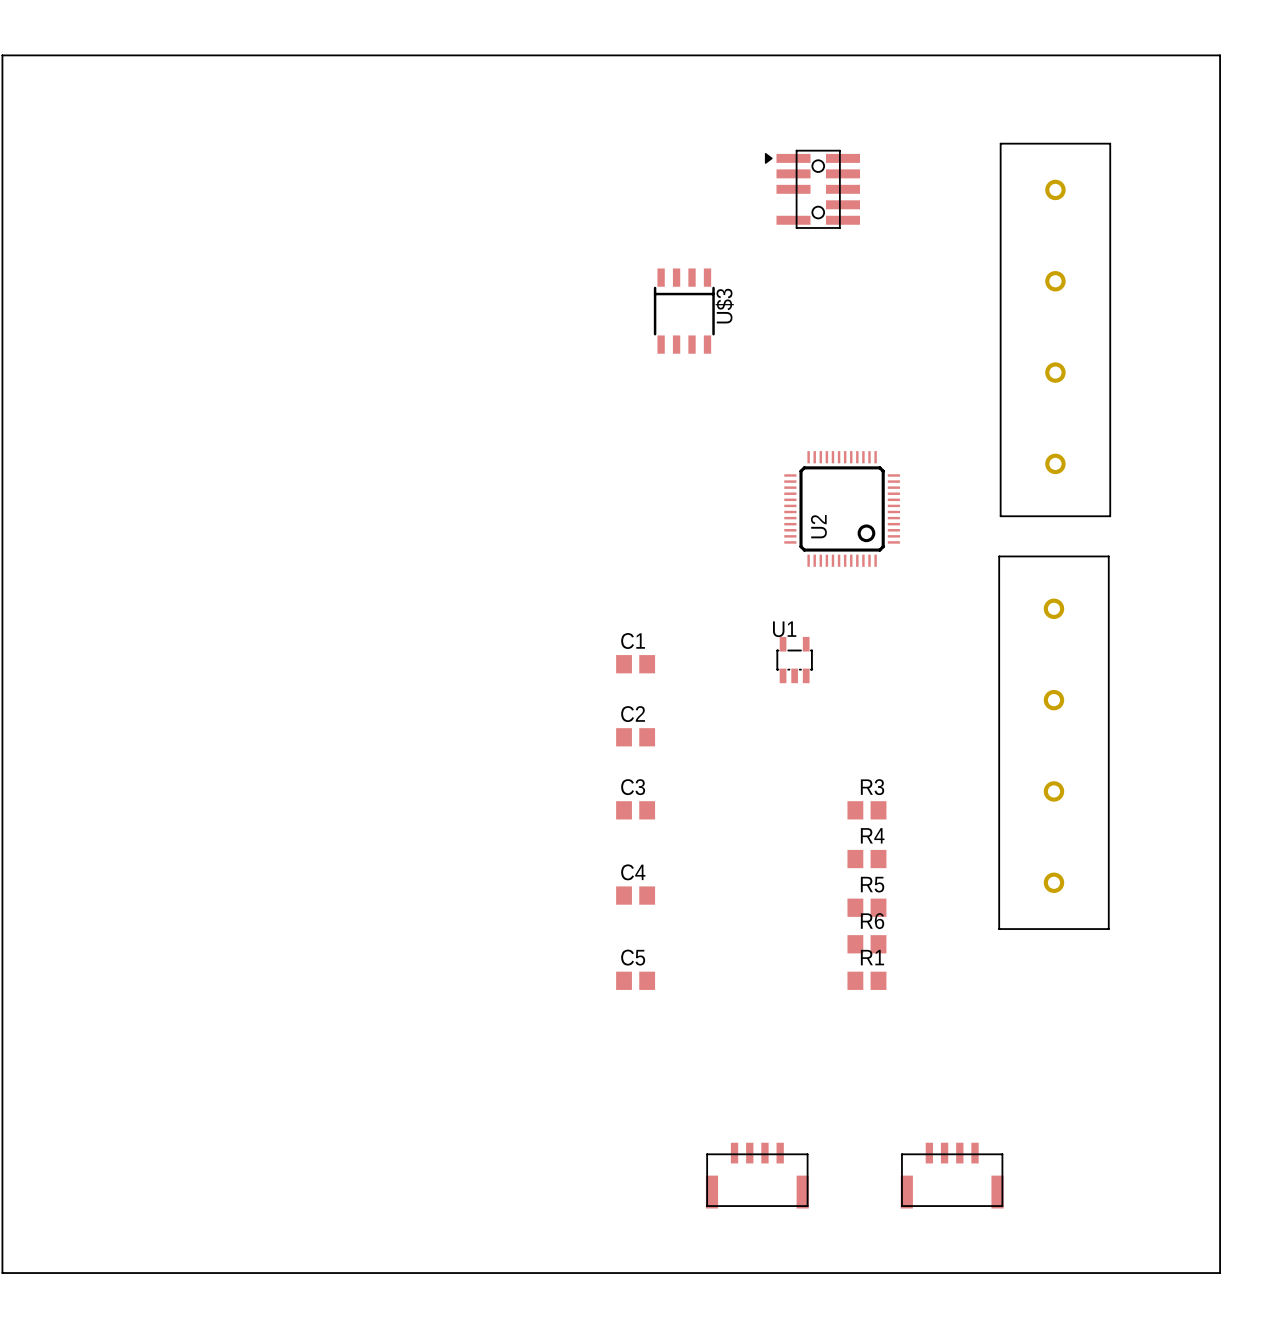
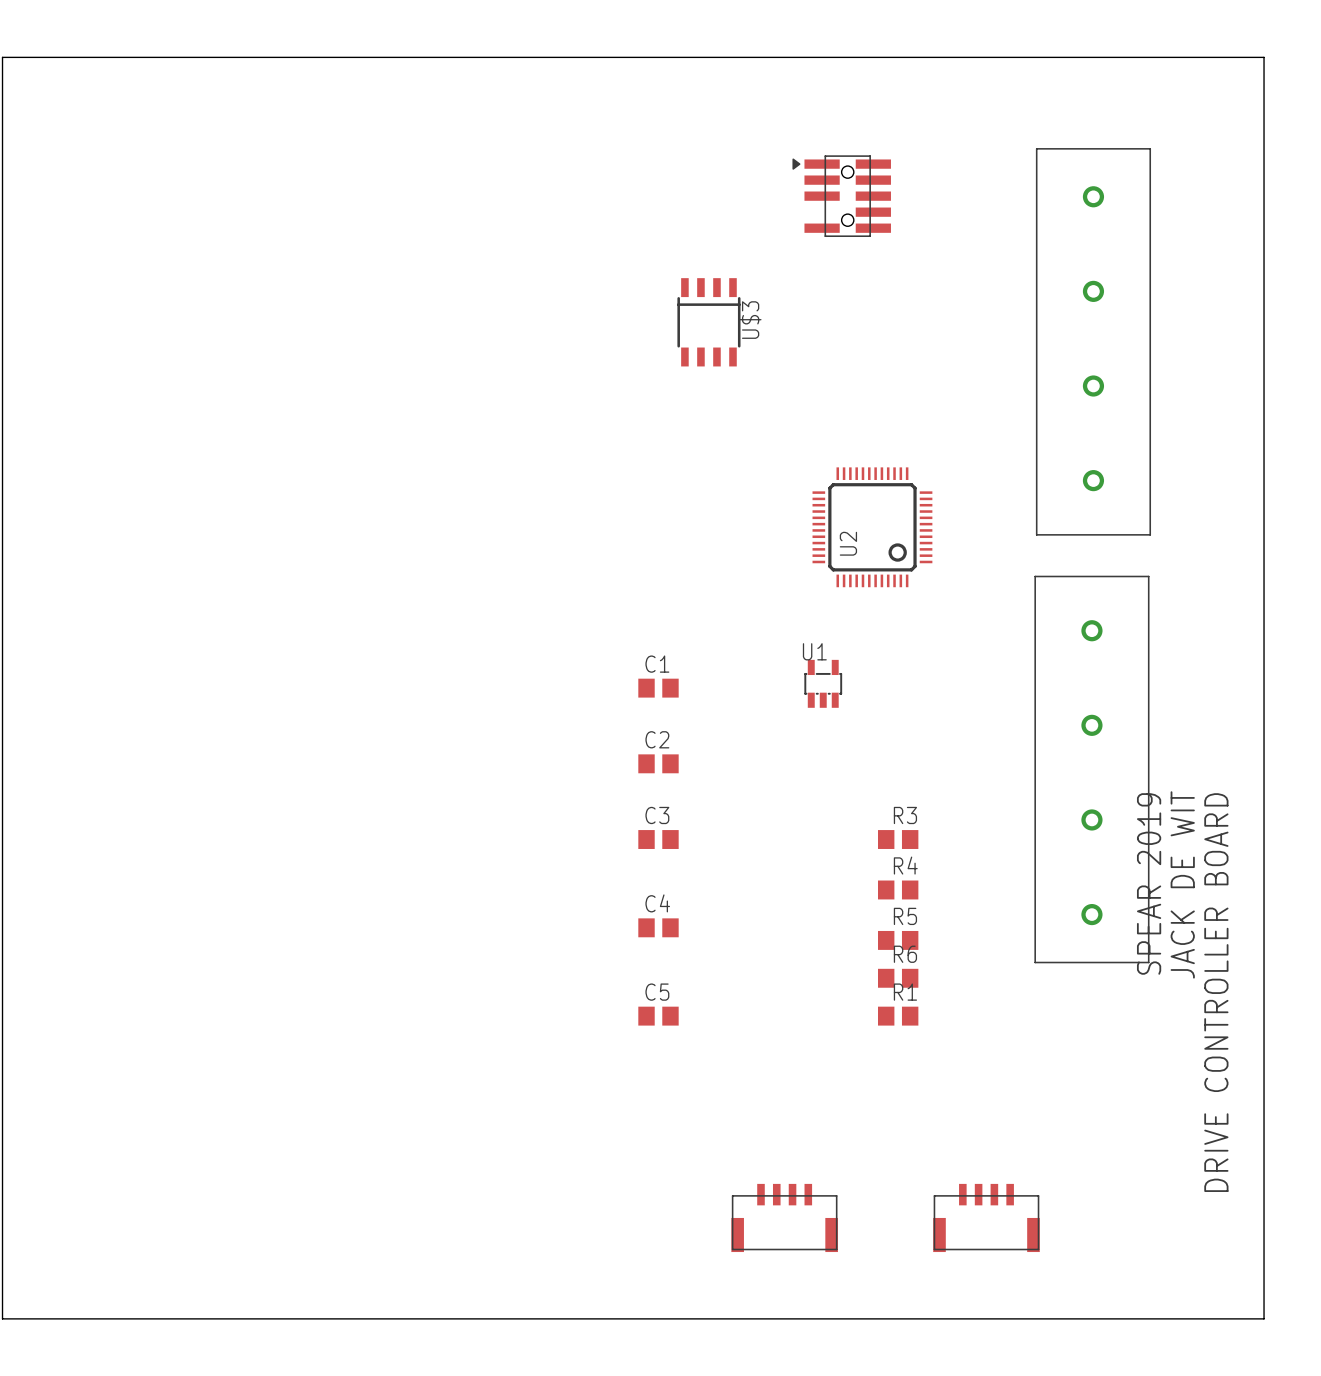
text: none -> SPEAR 2019 (1149, 883)
text: none -> JACK DE WIT (1182, 884)
text: none -> DRIVE CONTROLLER BOARD (1216, 992)

